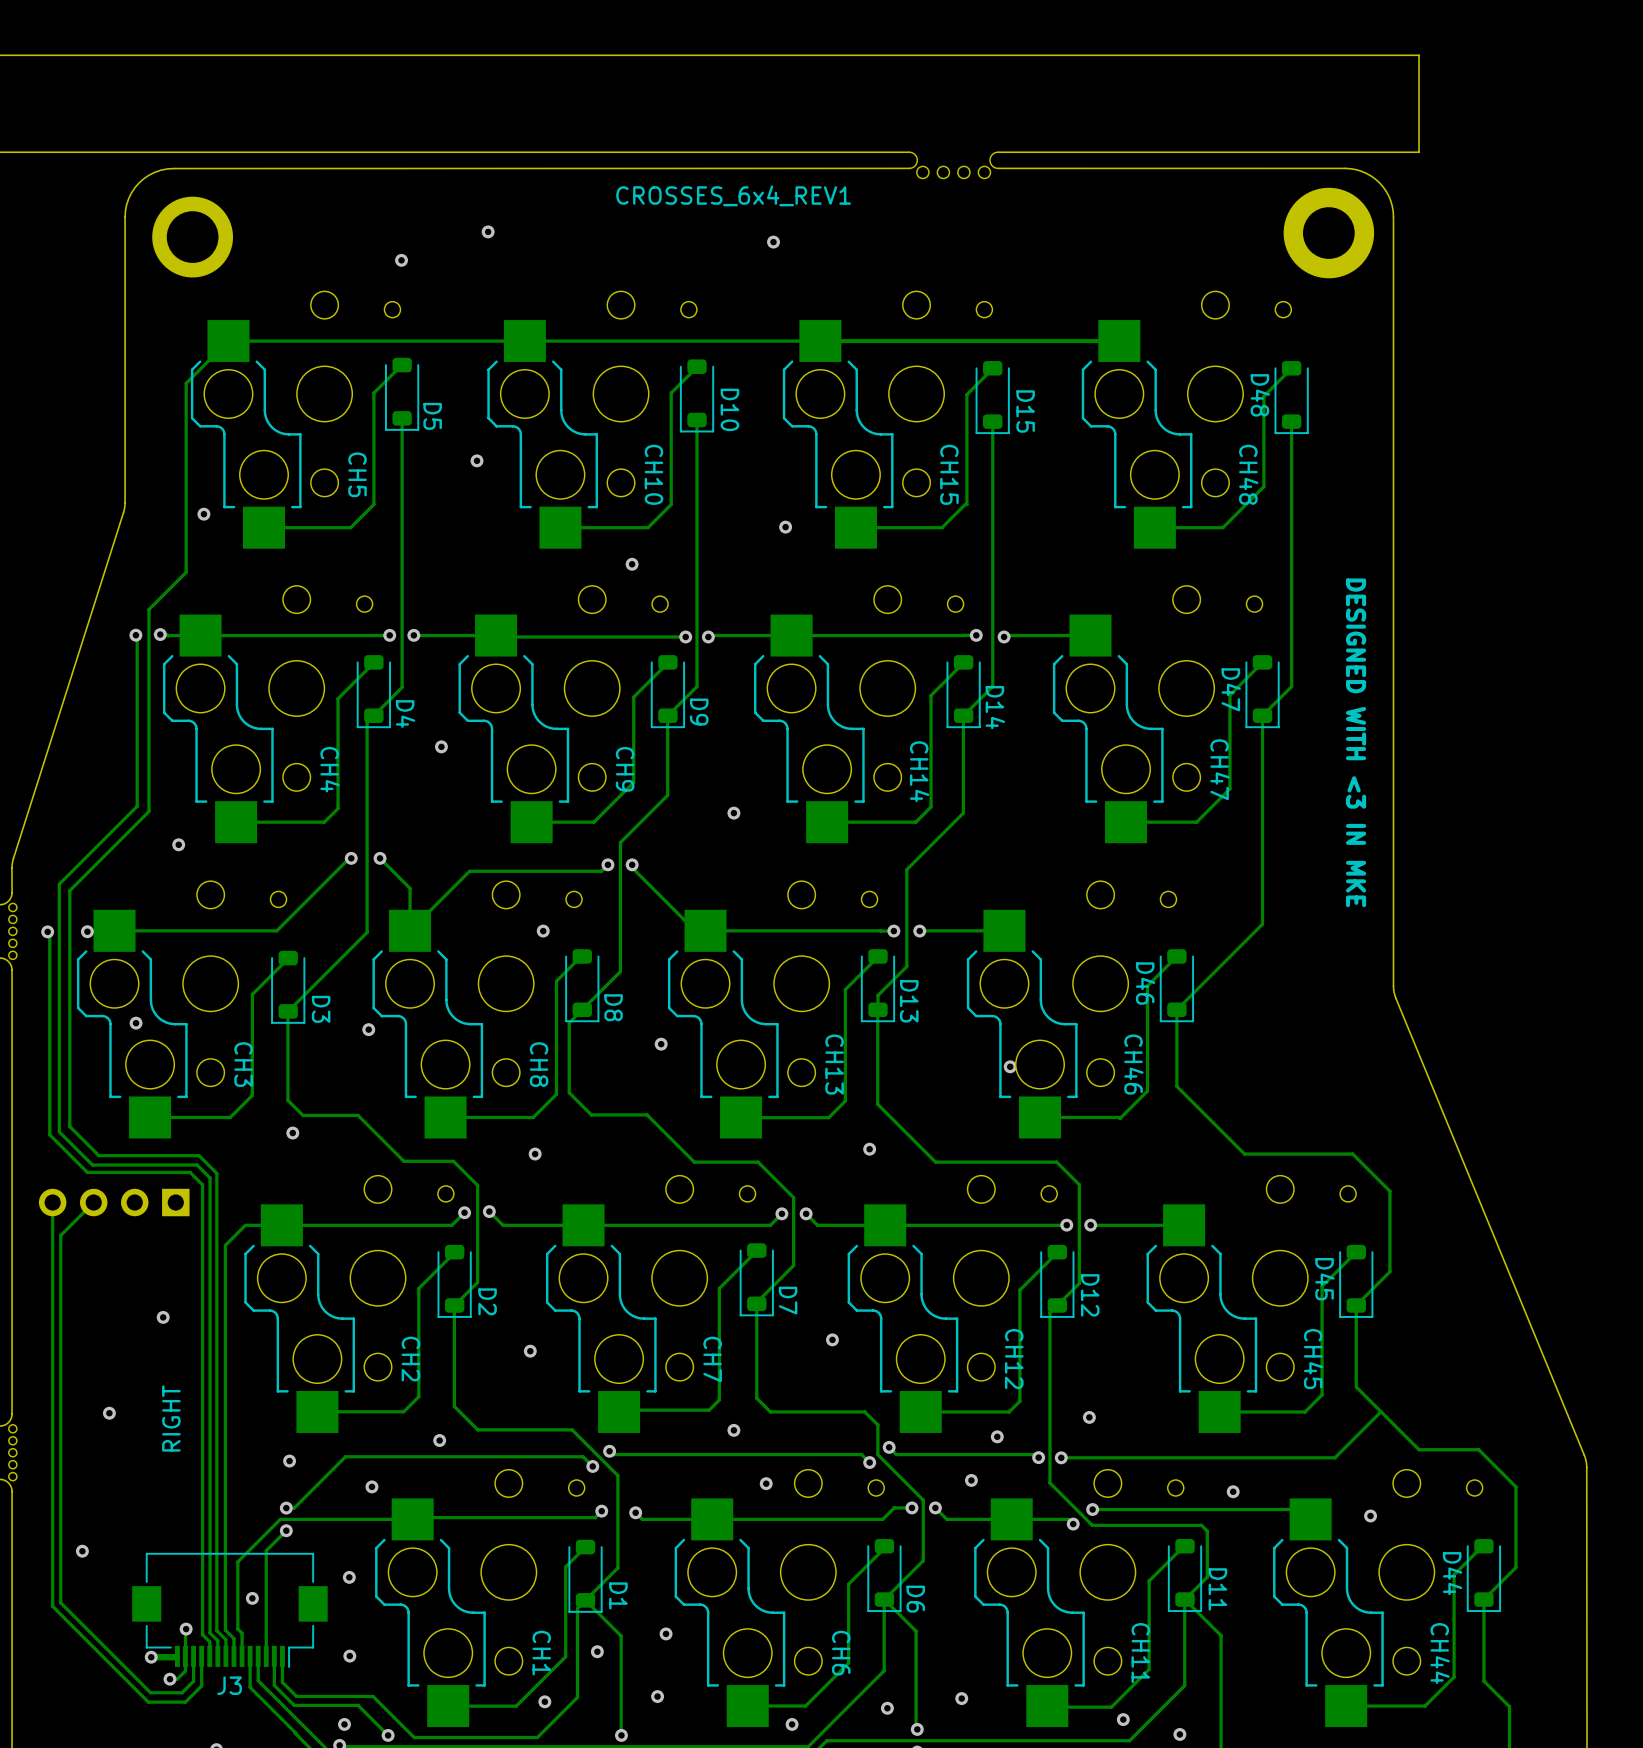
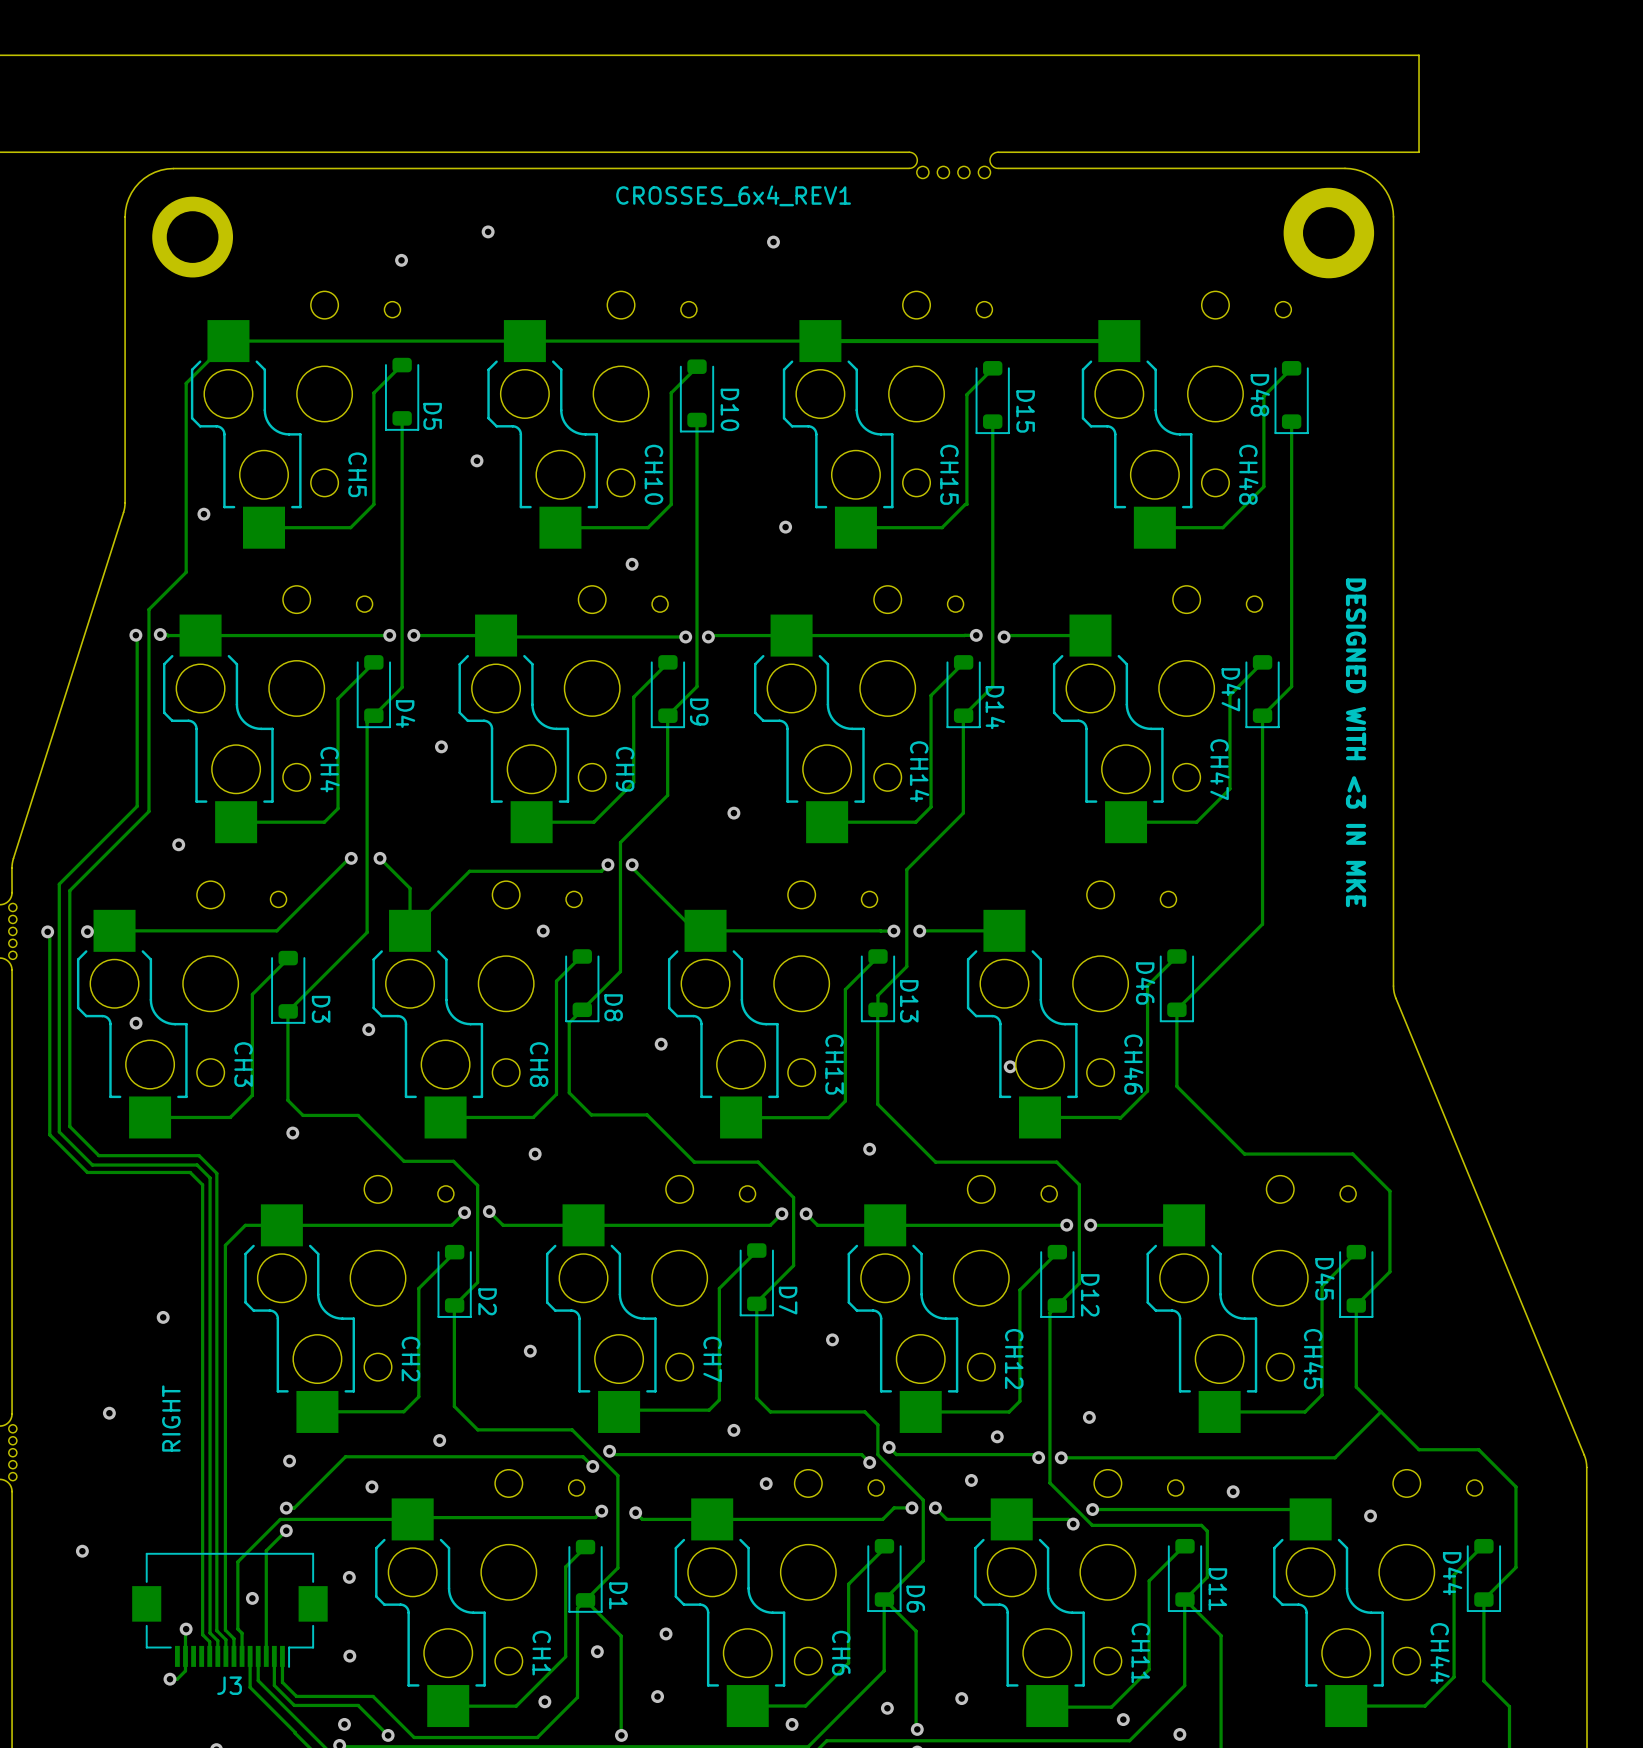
track: (52, 1202) (52, 1606) (148, 1702) (185, 1702) (201, 1685) (201, 1656) -> none
track: (93, 1202) (60, 1235) (60, 1602) (150, 1692) (182, 1692) (193, 1681) (193, 1656) -> none
part: (114, 1202) -> none
track: (176, 1656) (151, 1657) -> none
via: (151, 1657) -> none

